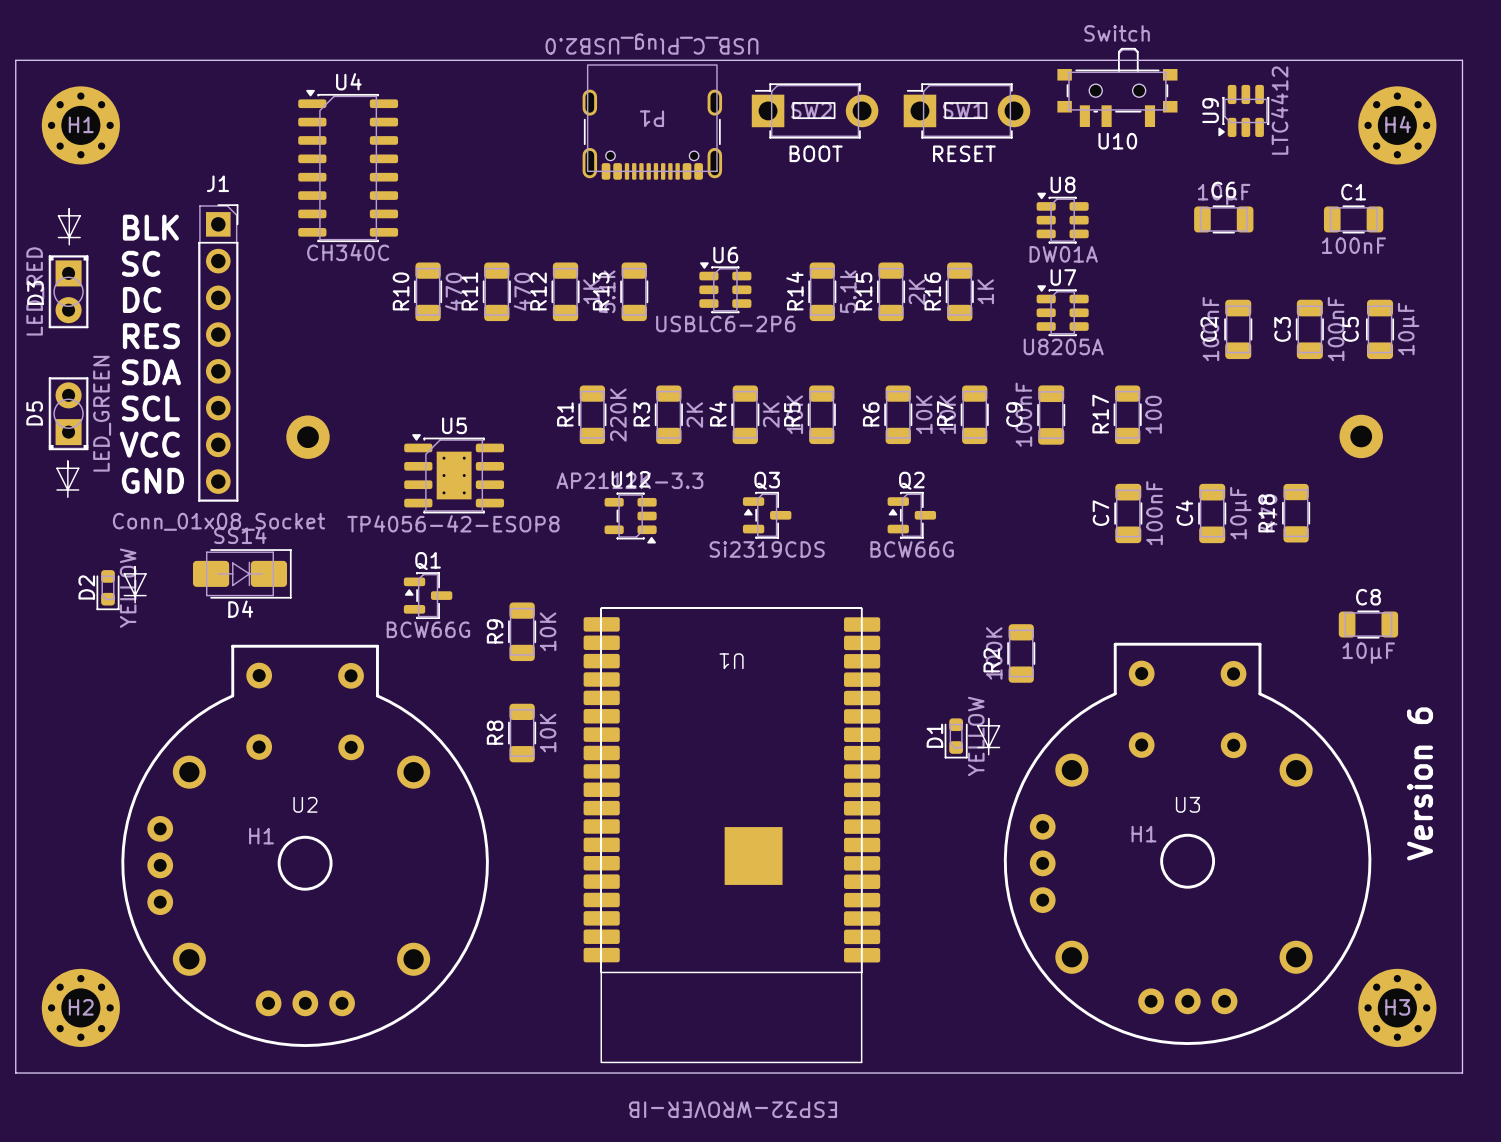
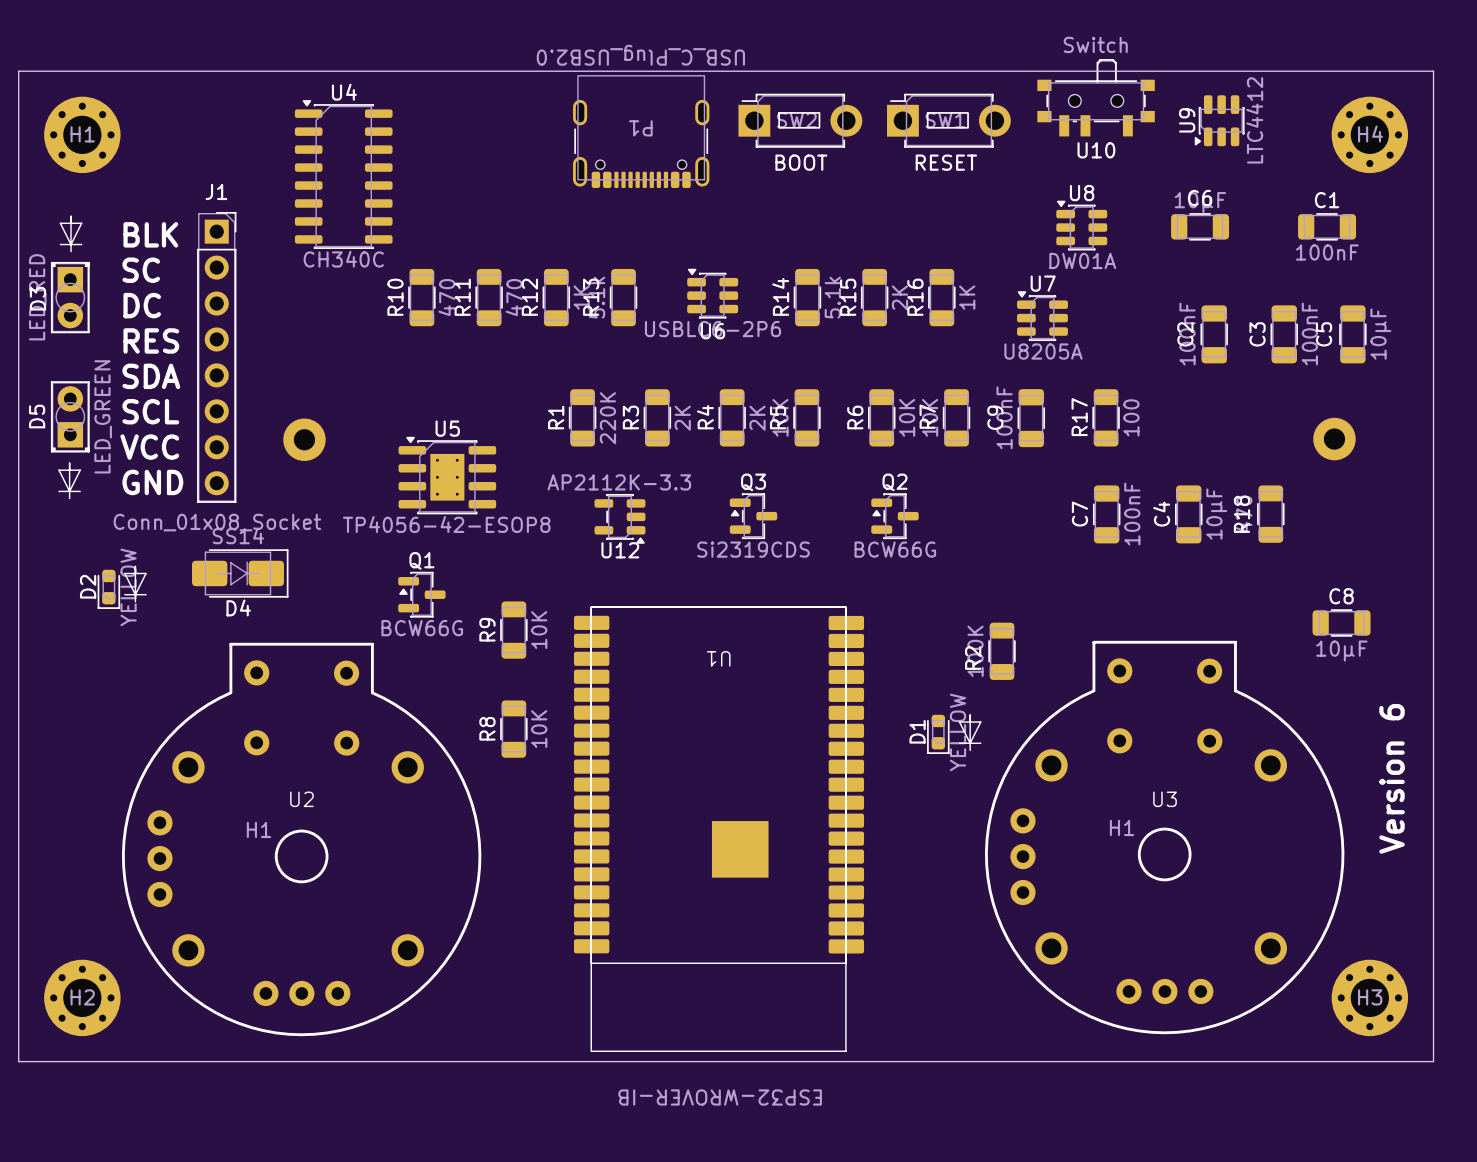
U8 position: (1062, 218) -> (1081, 225)
U6 name position: U6 (725, 255) -> U6 (712, 331)
U12 name position: U12 (630, 479) -> U12 (620, 550)

